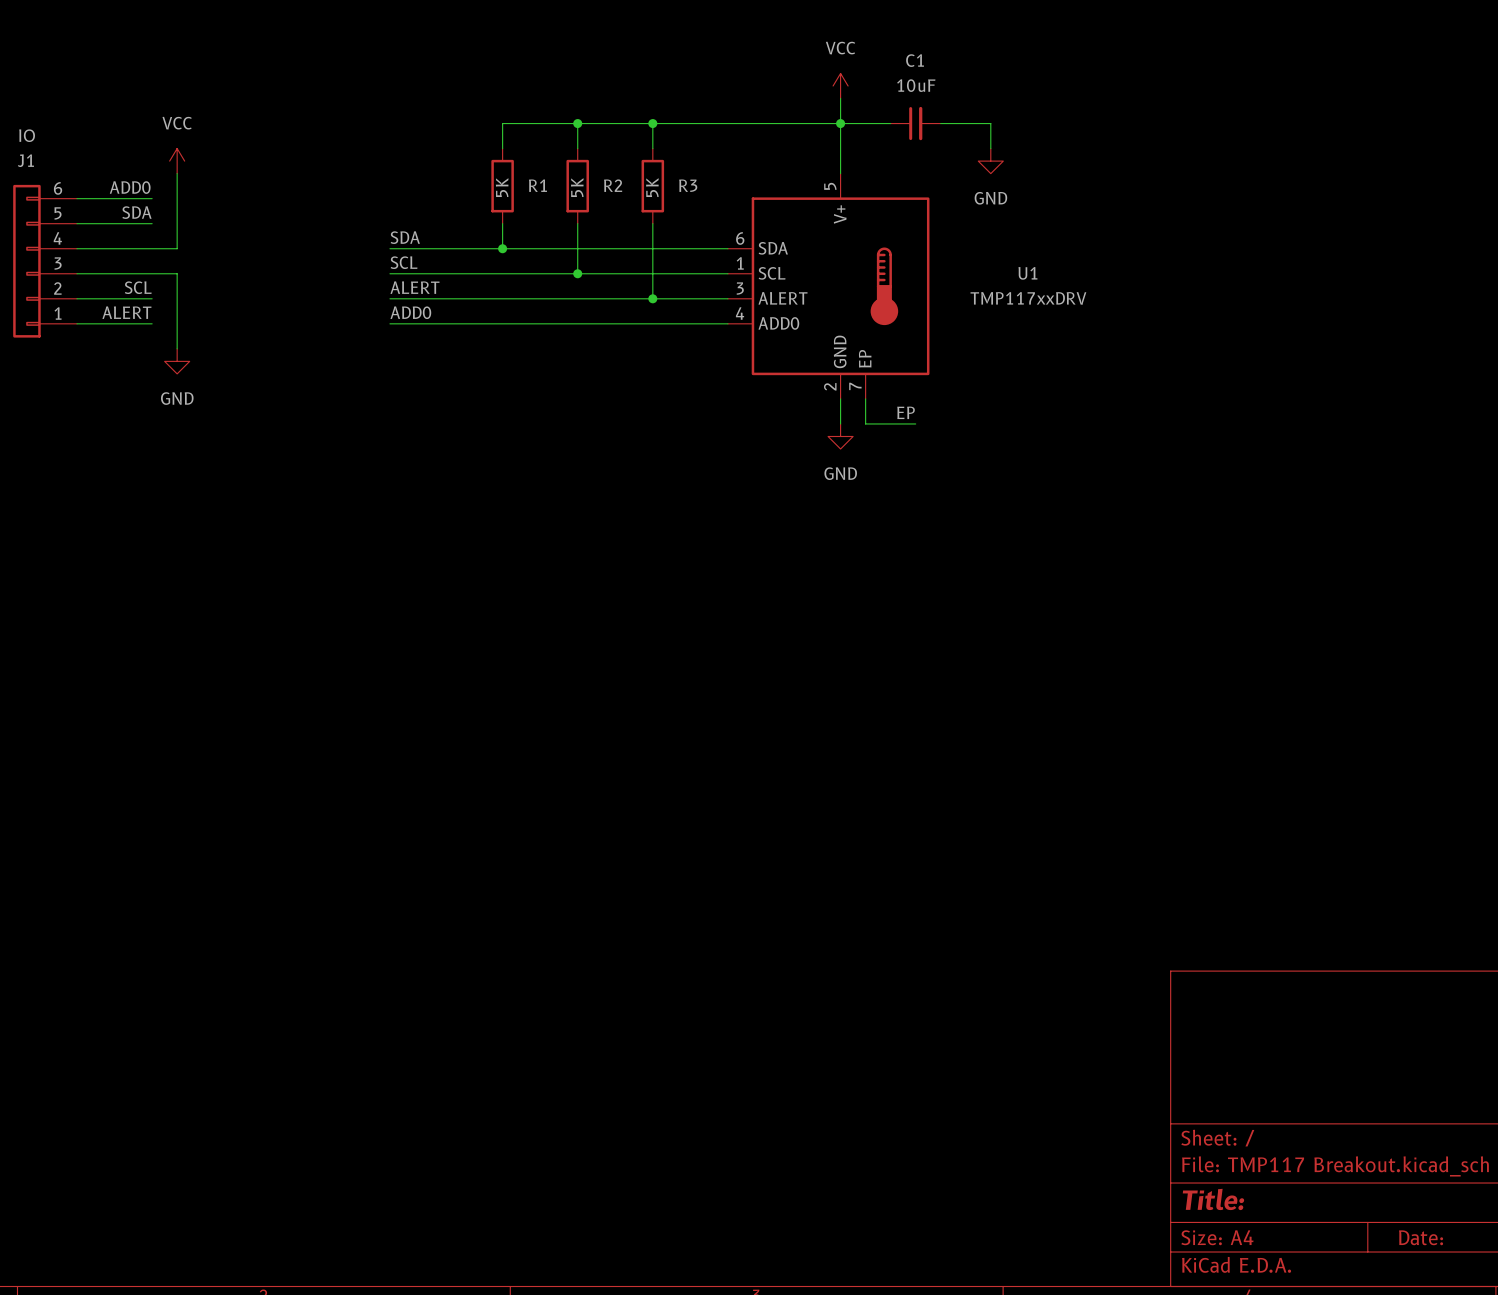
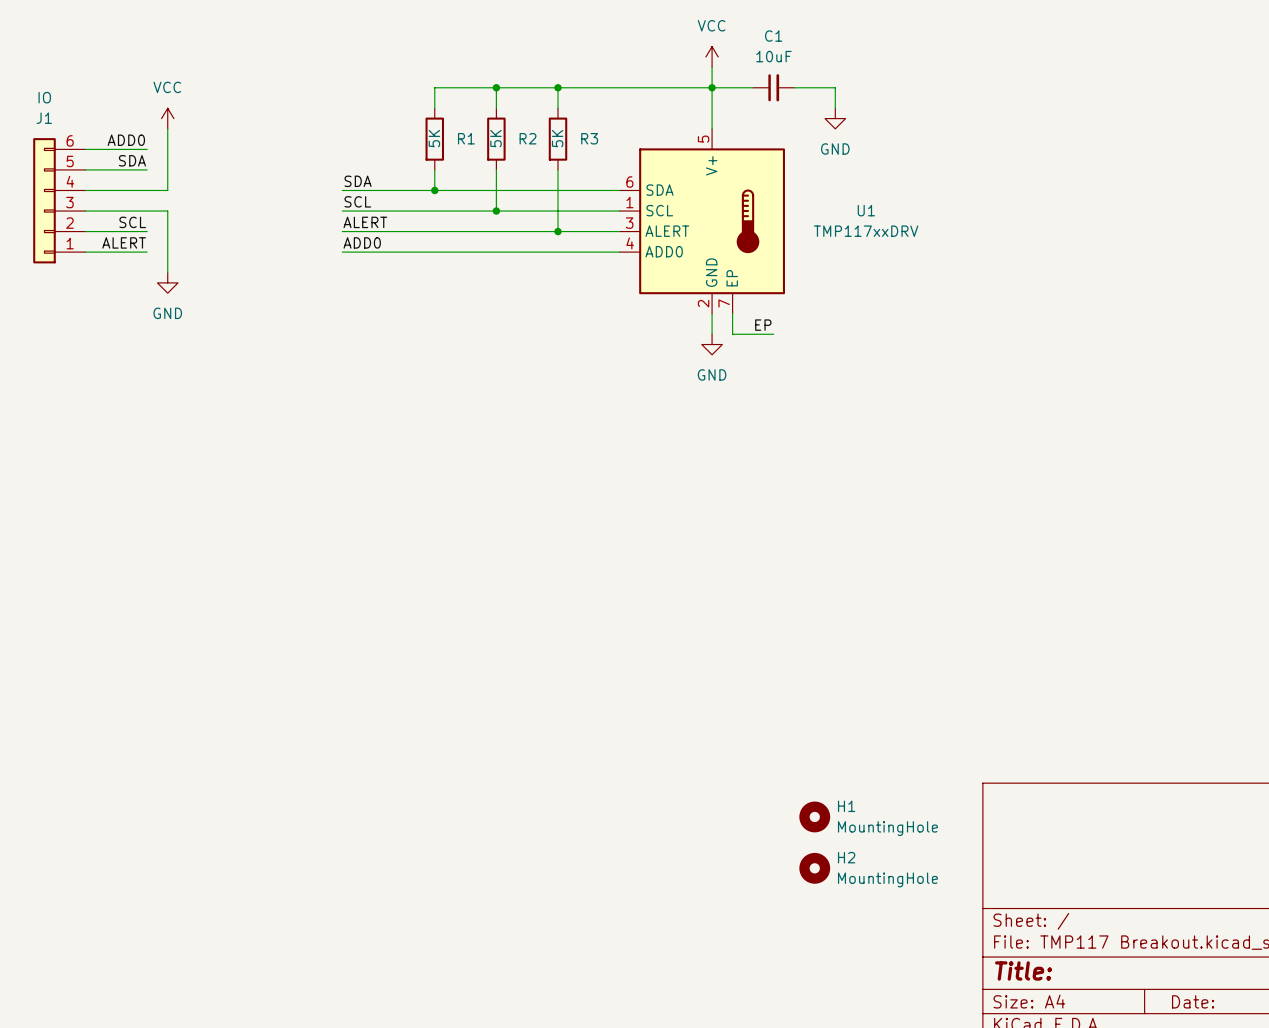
H1: none -> MountingHole (814, 816)
H2: none -> MountingHole (814, 868)

